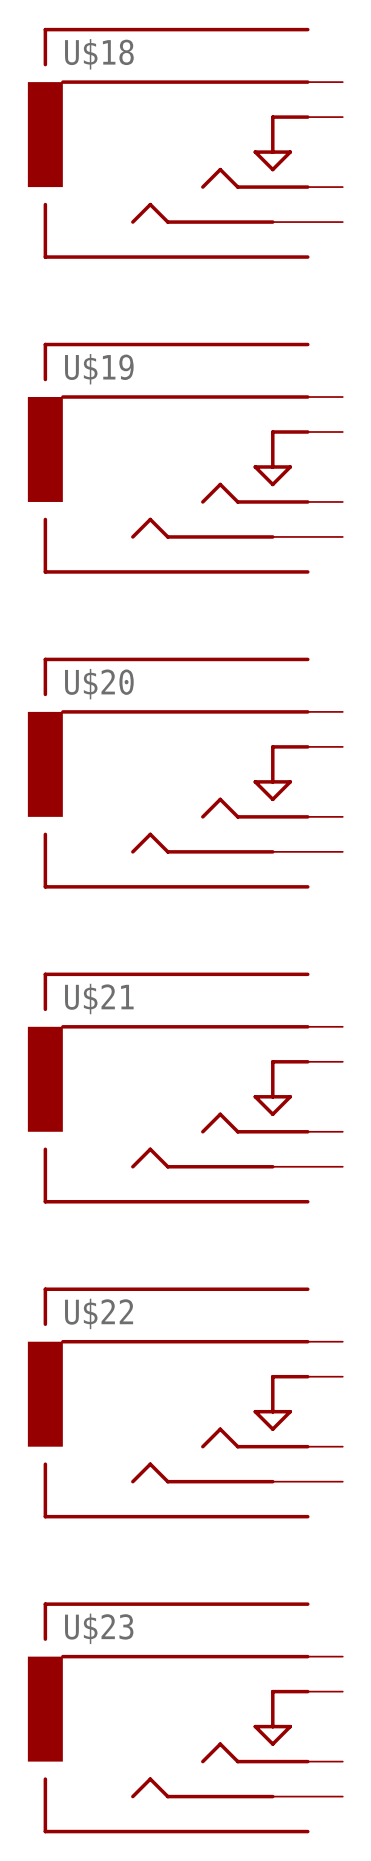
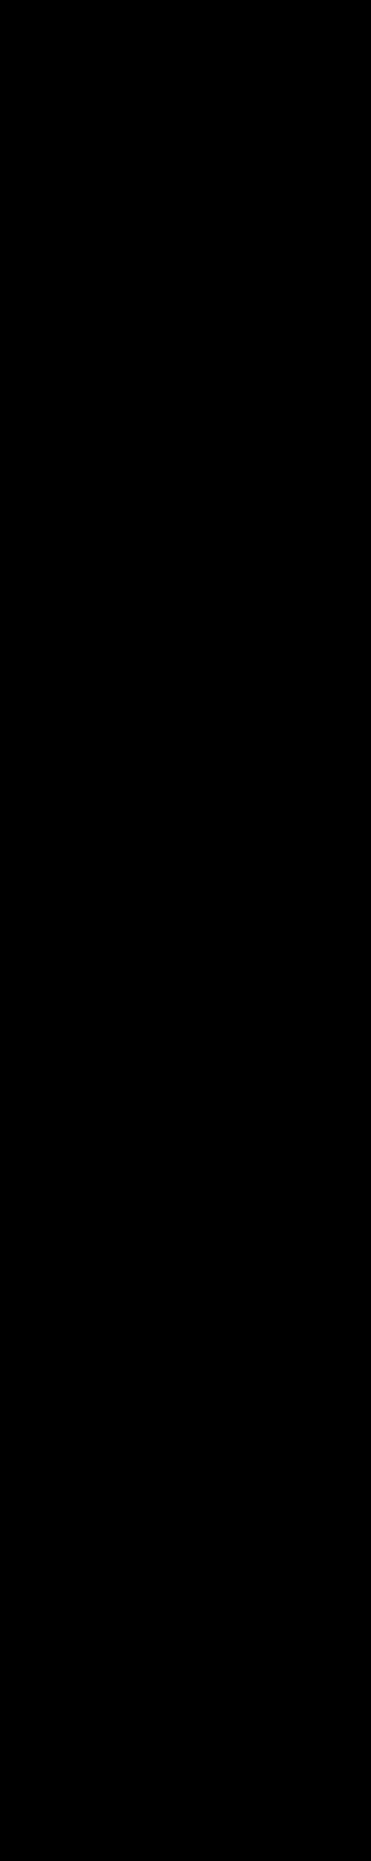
U$18: (185, 143) -> none
U$19: (185, 458) -> none
U$20: (185, 773) -> none
U$21: (185, 1088) -> none
U$22: (185, 1402) -> none
U$23: (185, 1717) -> none

